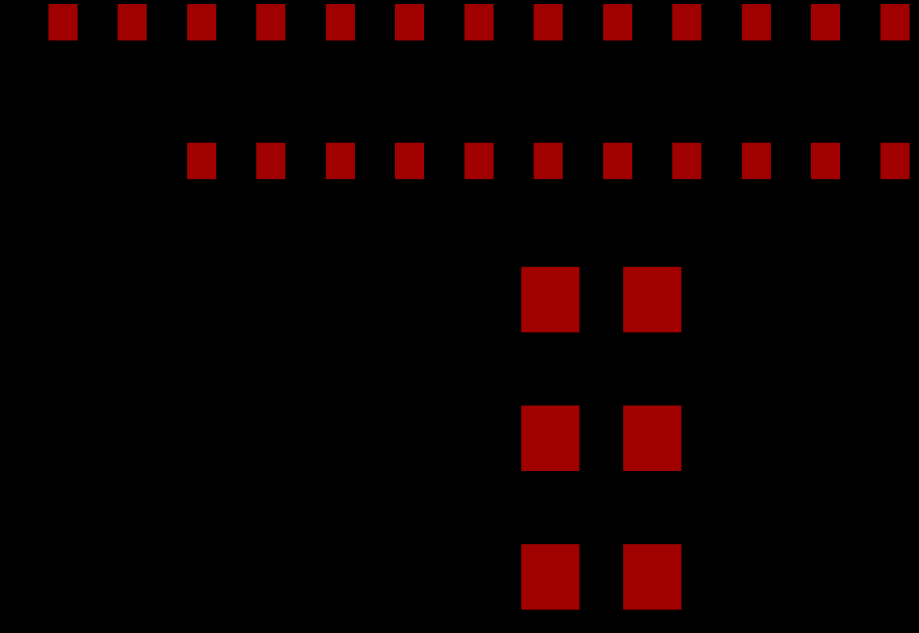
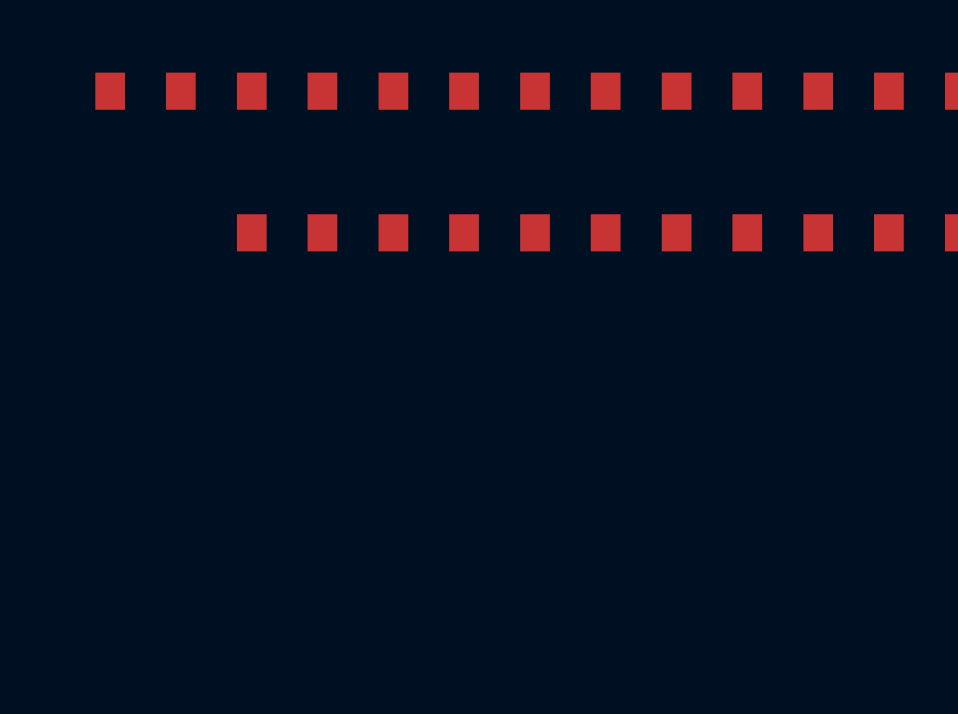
part: (601, 299) -> none
part: (601, 438) -> none
part: (601, 576) -> none

